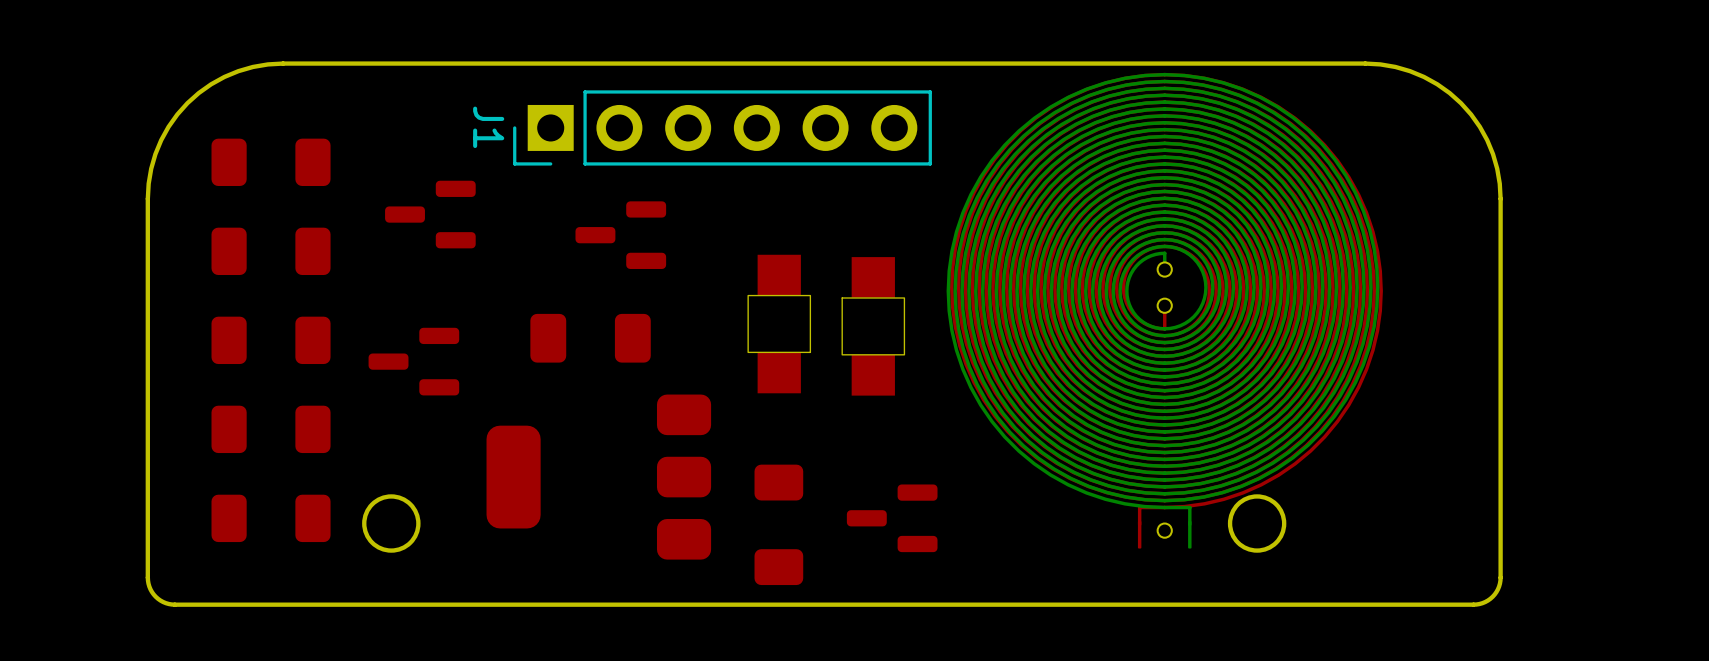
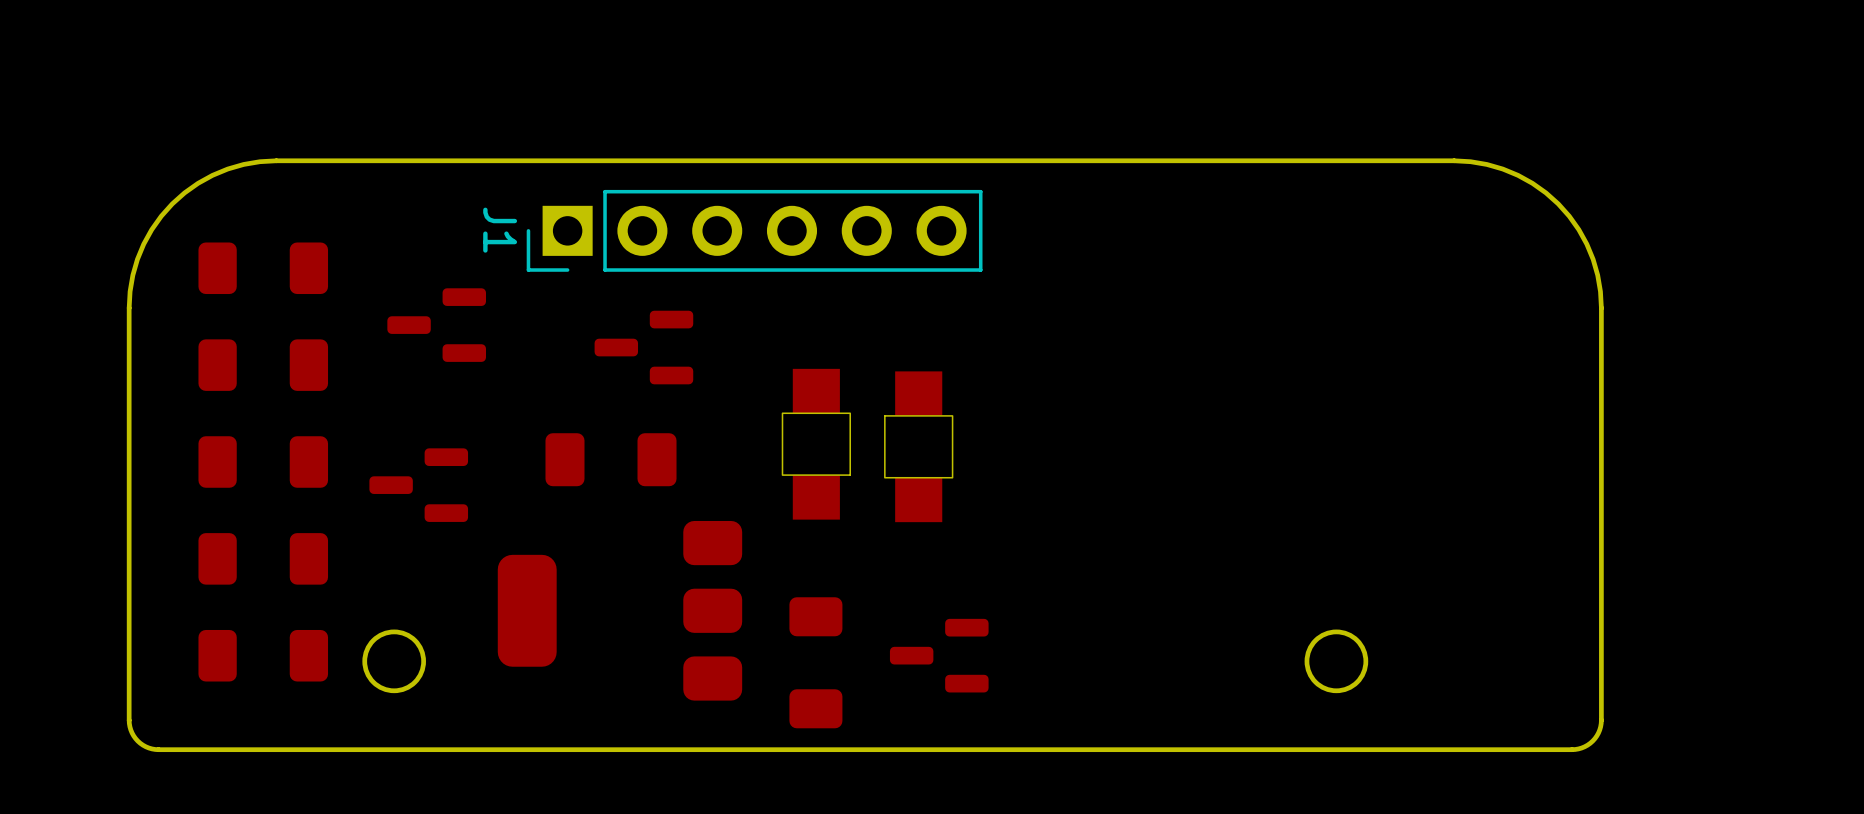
part: (1164, 310) -> none

